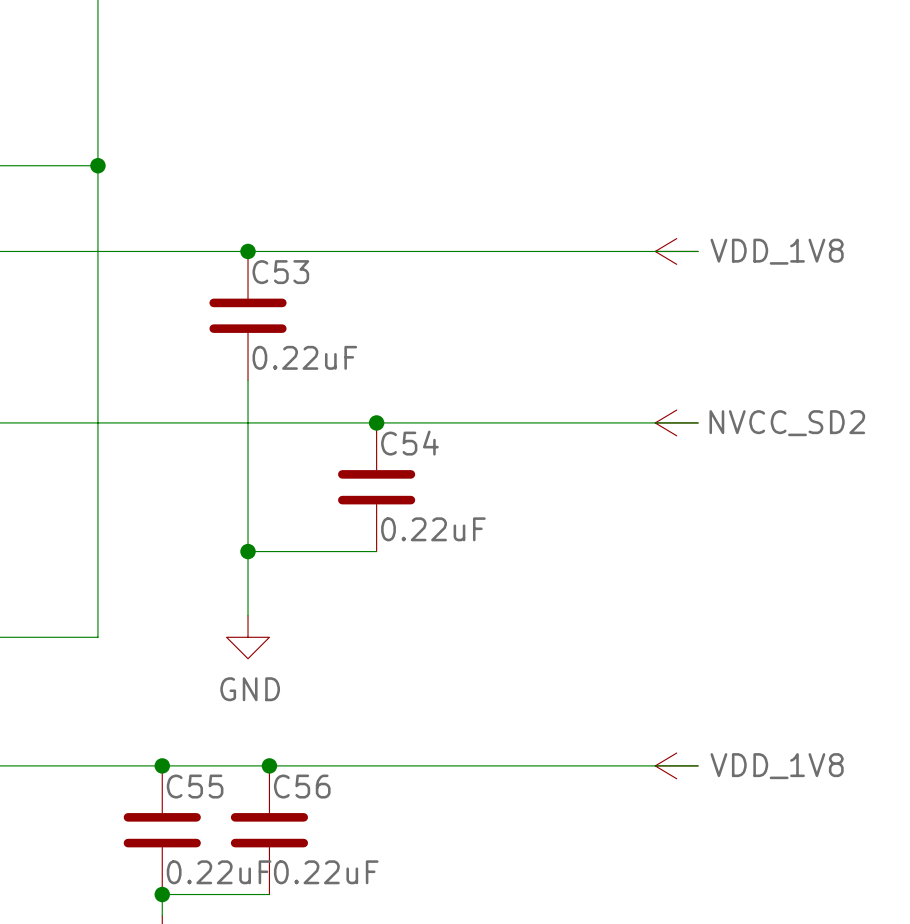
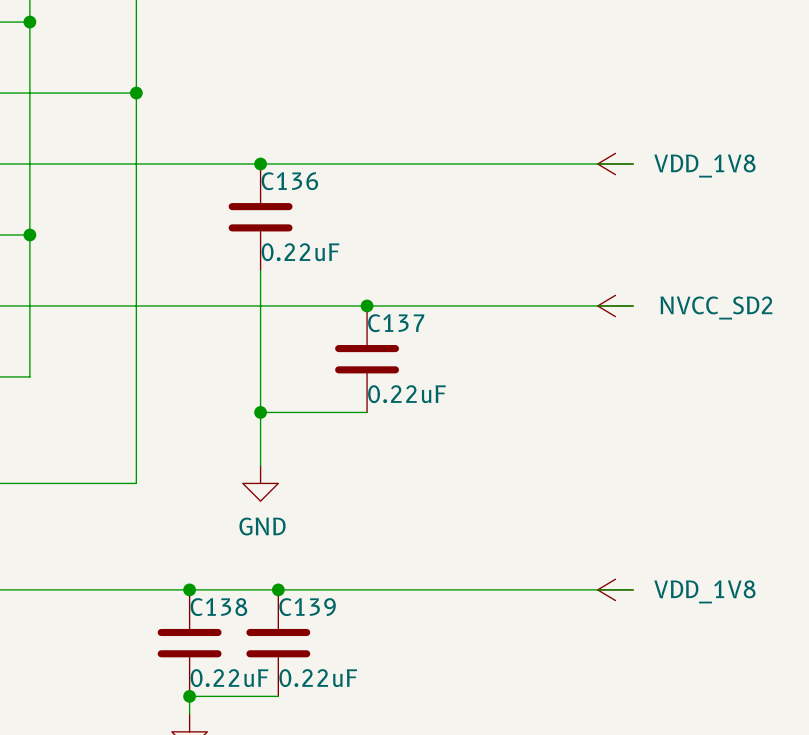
C53 name: C53 (280, 272) -> C136 (289, 181)
C54 name: C54 (409, 443) -> C137 (396, 323)
C55 name: C55 (195, 786) -> C138 (218, 607)
C56 name: C56 (302, 786) -> C139 (307, 607)

